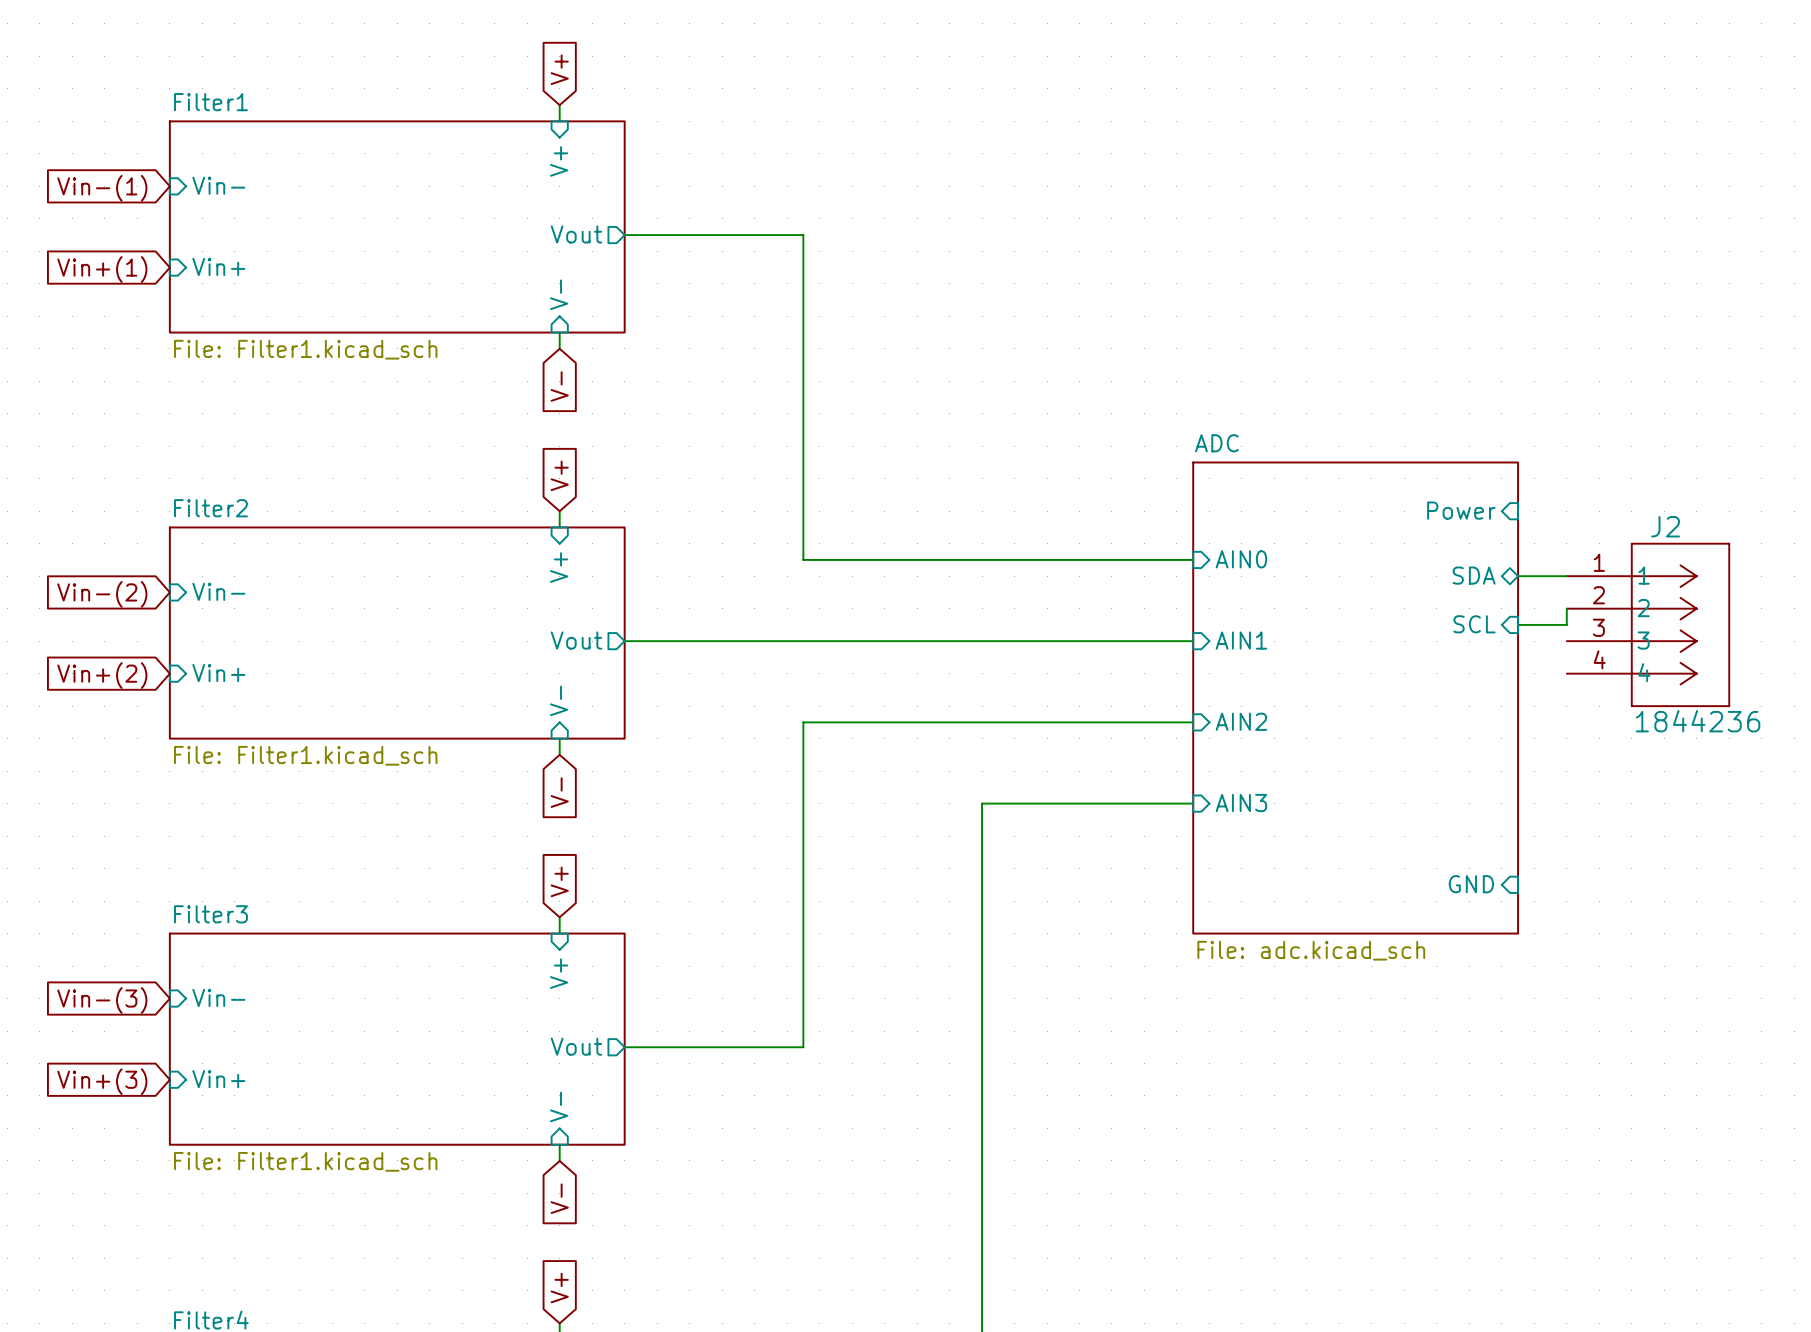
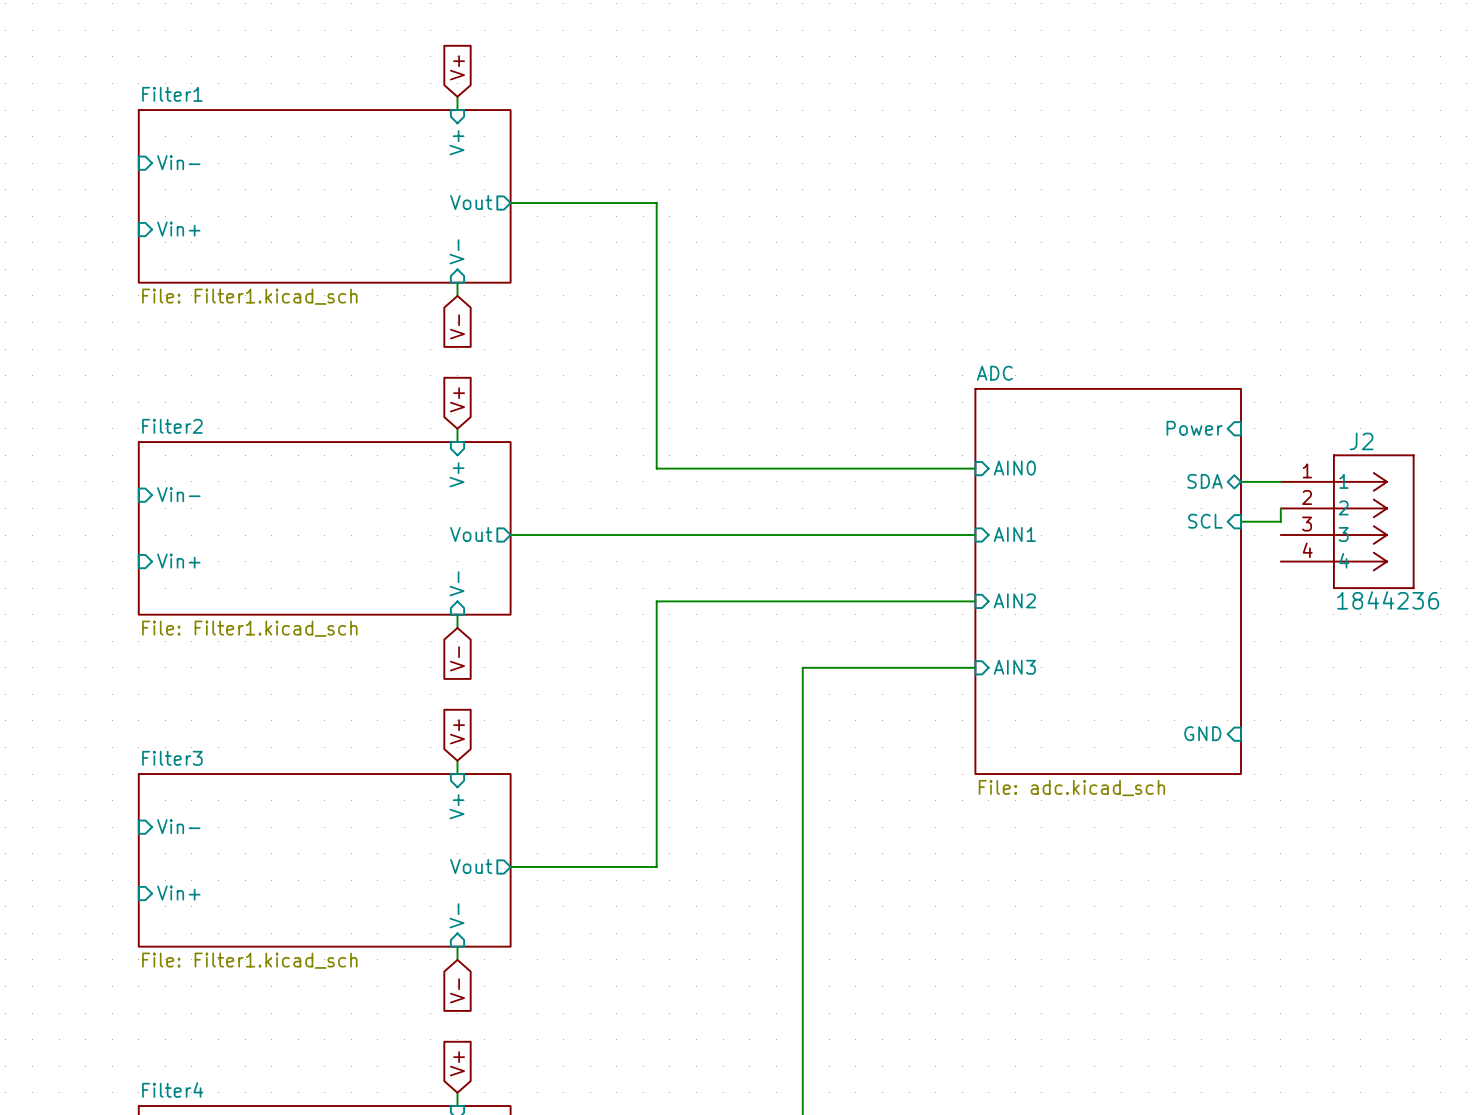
global label: Vin-(1) (102, 188) -> none
global label: Vin+(1) (102, 269) -> none
global label: Vin-(2) (102, 594) -> none
global label: Vin+(2) (102, 675) -> none
global label: Vin-(3) (102, 1000) -> none
global label: Vin+(3) (102, 1081) -> none

